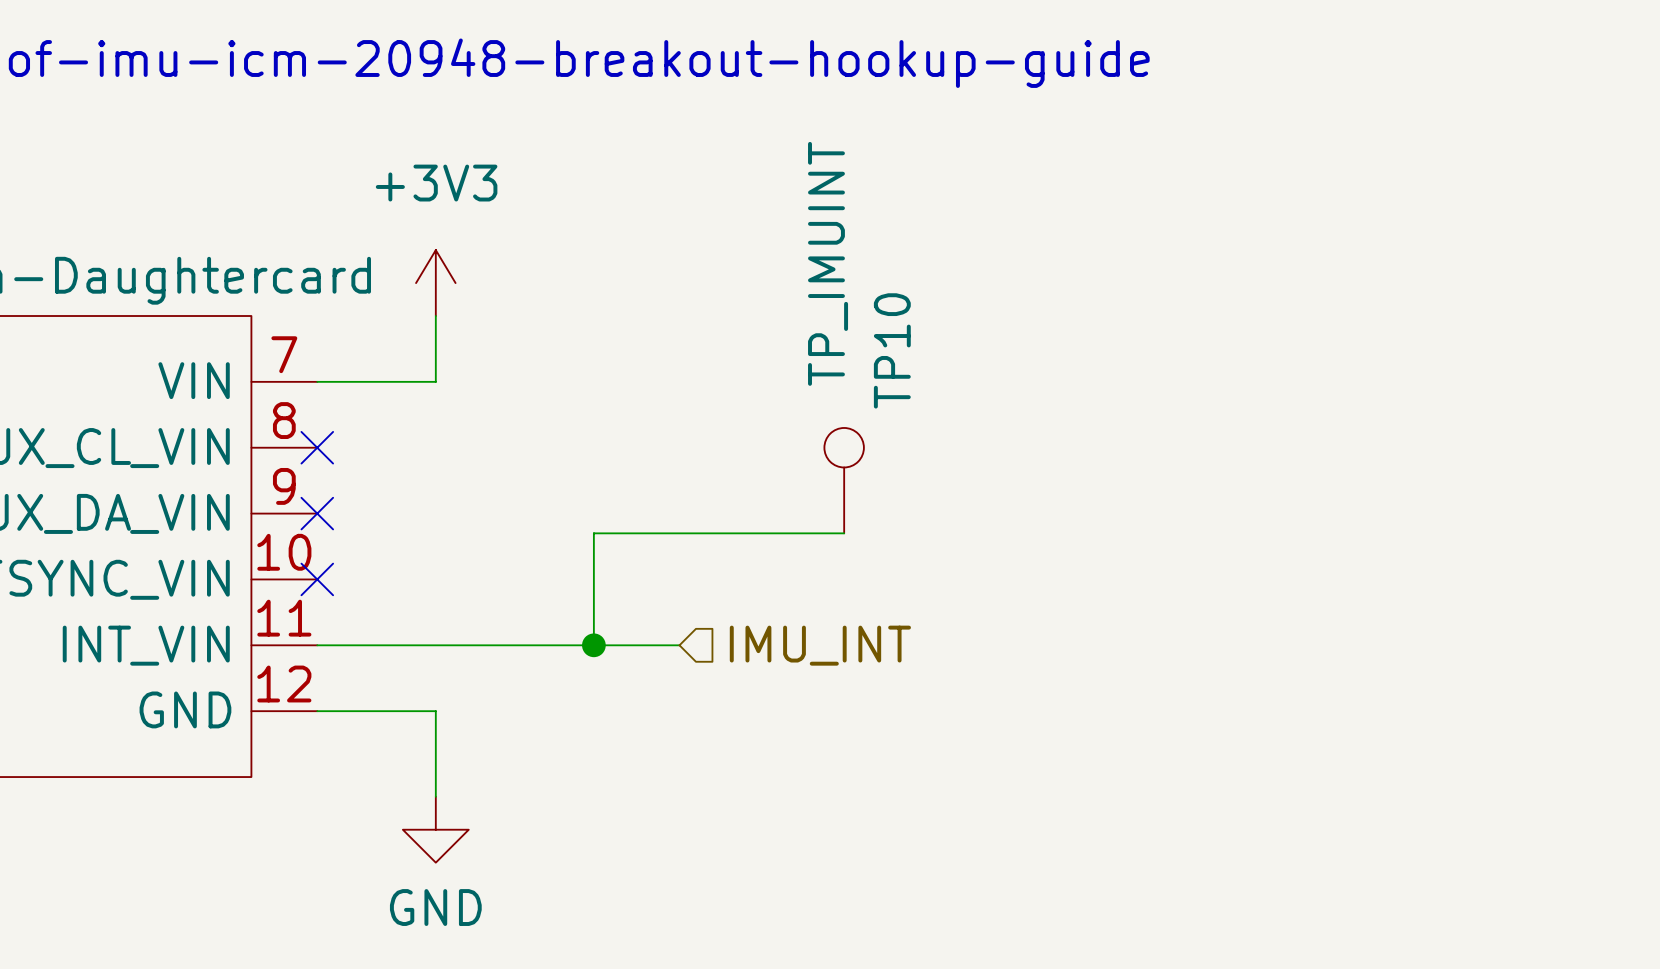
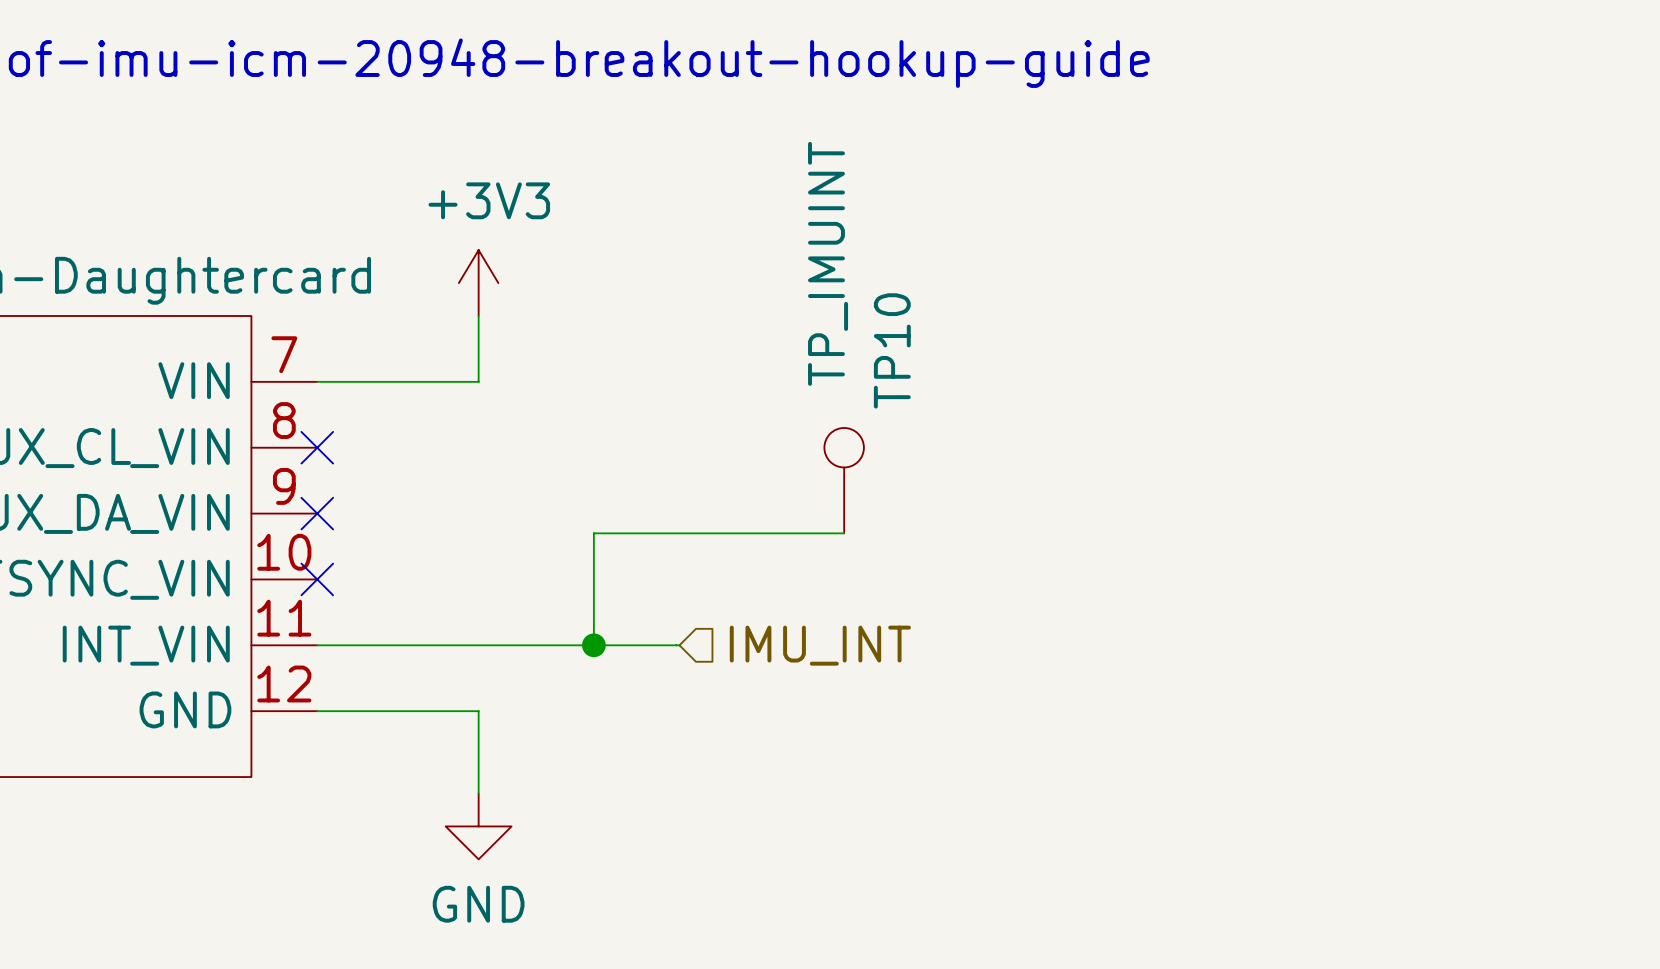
power symbol text position: +3V3 (436, 183) -> +3V3 (489, 200)
power symbol position: +3V3 (435, 283) -> +3V3 (478, 283)
wire: (435, 316) (435, 381) -> (478, 316) (478, 381) (435, 381)
wire: (435, 711) (435, 796) -> (435, 711) (478, 711) (478, 793)
power symbol position: GND (435, 829) -> GND (478, 826)

